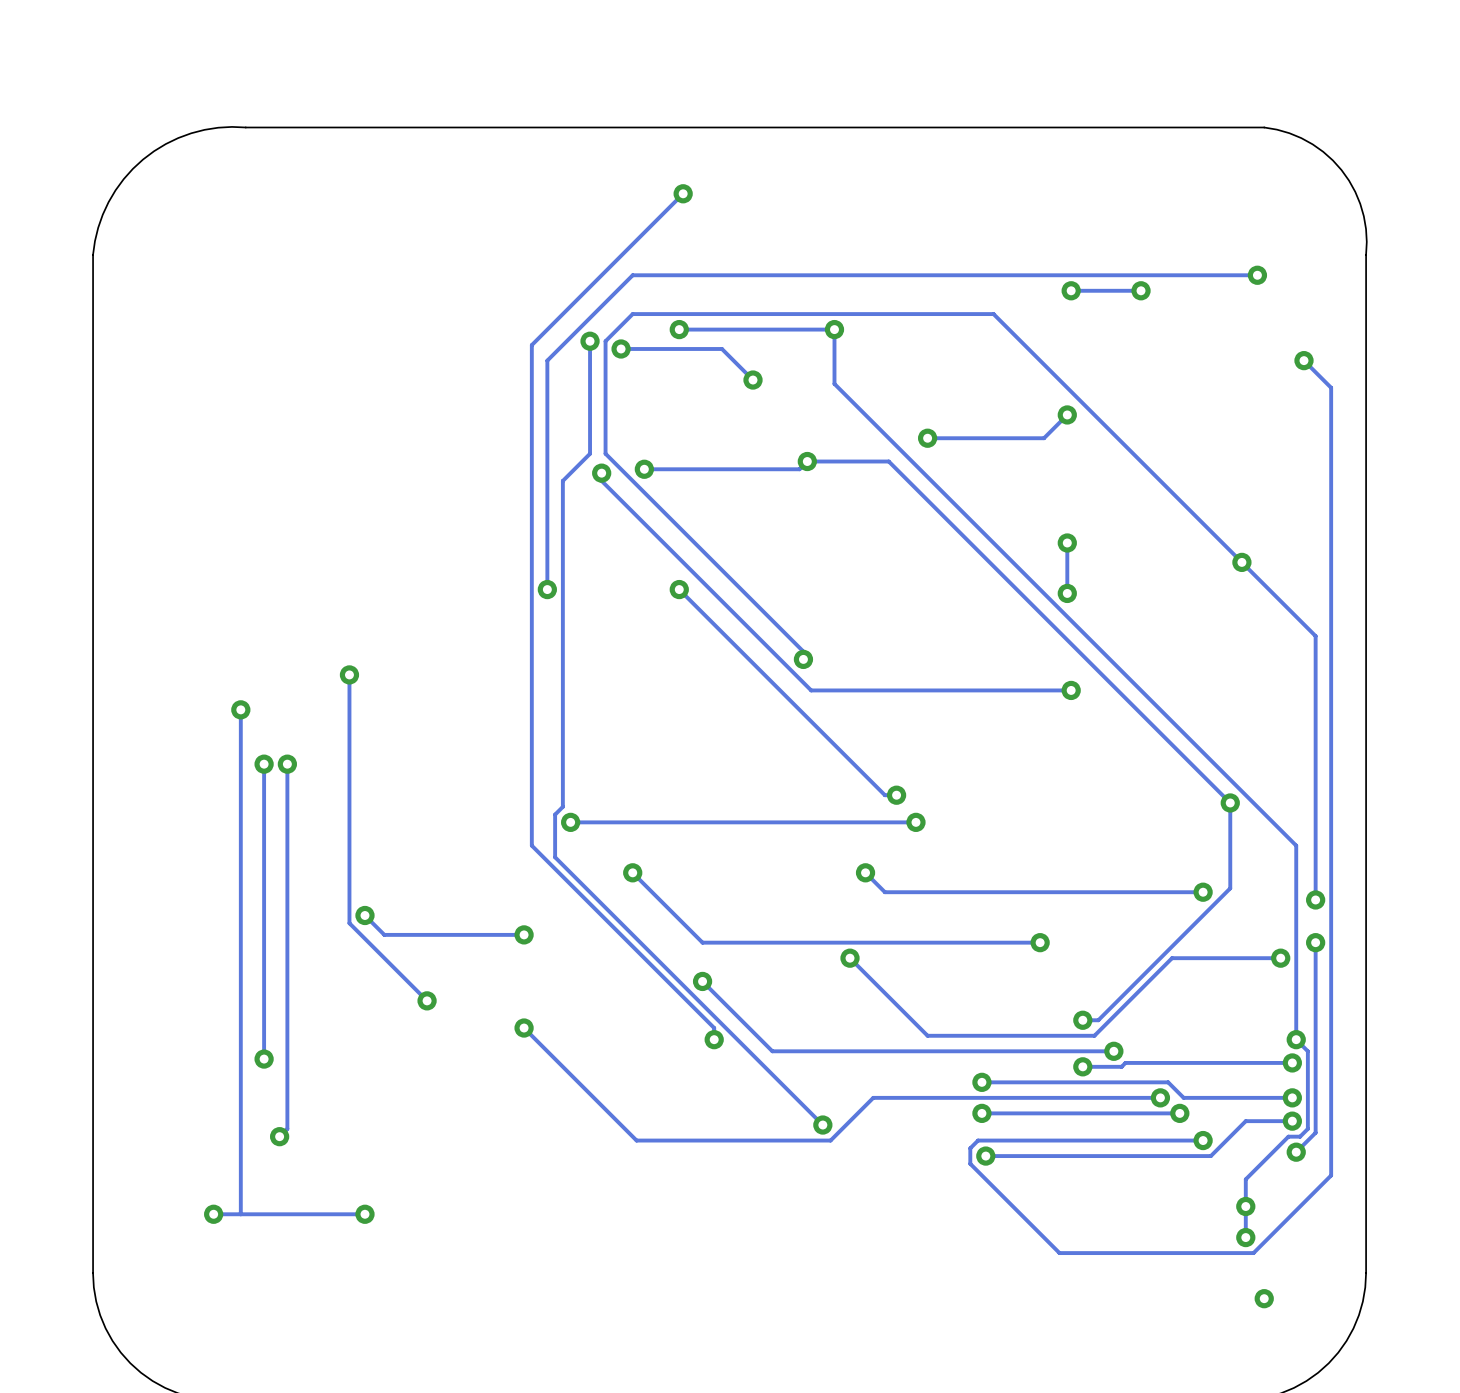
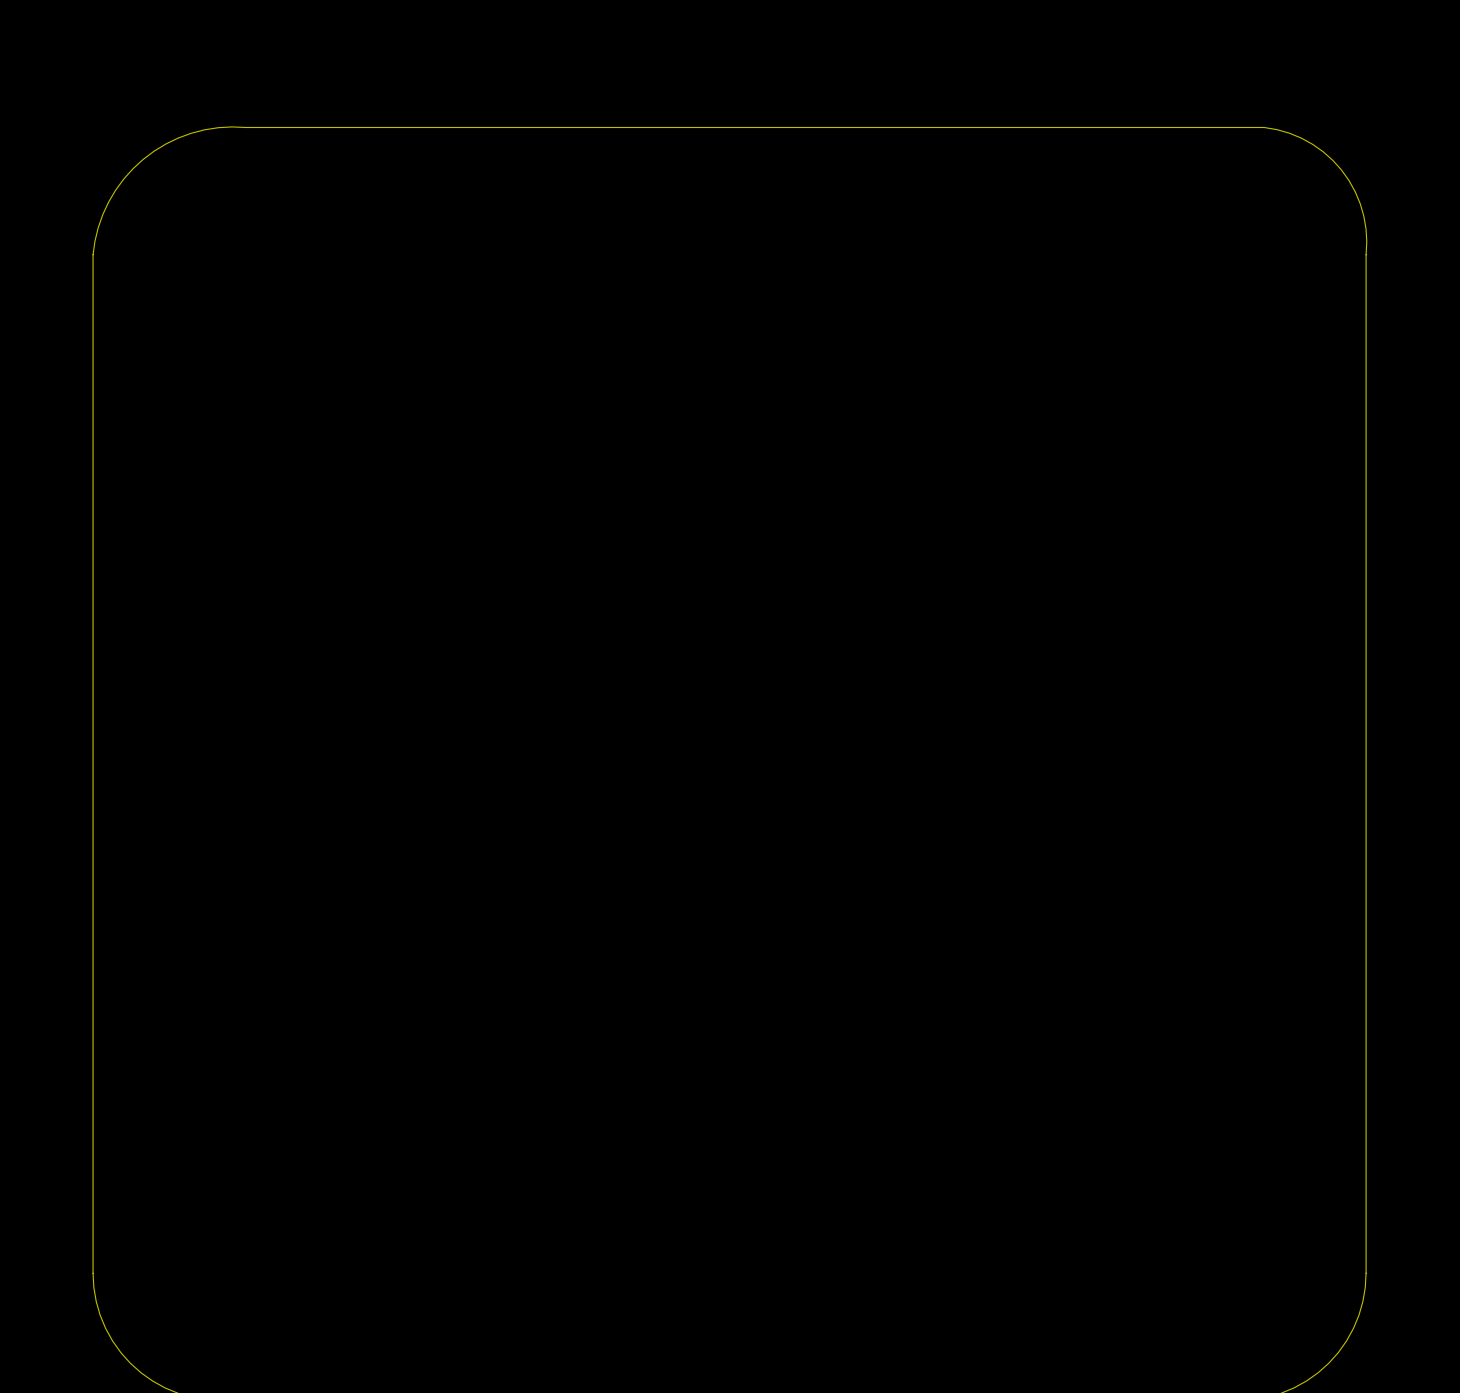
track: (683, 193) (531, 345) (531, 845) (714, 1028) (714, 1039) -> none
via: (683, 193) -> none
track: (1257, 275) (632, 275) (547, 360) (547, 589) -> none
via: (1257, 275) -> none
via: (1071, 290) -> none
track: (1141, 290) (1071, 290) -> none
via: (1141, 290) -> none
track: (679, 329) (834, 329) (834, 383) (1296, 845) (1296, 1039) (1307, 1051) (1307, 1128) (1300, 1136) (1288, 1136) (1245, 1179) (1245, 1237) -> none
via: (679, 329) -> none
via: (834, 329) -> none
track: (590, 341) (590, 453) (562, 480) (562, 806) (555, 814) (555, 857) (822, 1125) -> none
via: (590, 341) -> none
track: (621, 348) (721, 348) (753, 380) -> none
via: (621, 348) -> none
track: (1303, 360) (1331, 387) (1331, 1175) (1253, 1253) (1059, 1253) (970, 1163) (970, 1148) (978, 1140) (1203, 1140) -> none
via: (1303, 360) -> none
via: (753, 380) -> none
track: (1067, 414) (1044, 438) (927, 438) -> none
via: (1067, 414) -> none
via: (927, 438) -> none
via: (807, 461) -> none
track: (644, 469) (799, 469) (807, 461) (888, 461) (1230, 802) (1230, 888) (1098, 1020) (1082, 1020) -> none
via: (644, 469) -> none
track: (601, 473) (601, 480) (811, 690) (1071, 690) -> none
via: (601, 473) -> none
track: (1067, 543) (1067, 593) -> none
via: (1067, 543) -> none
via: (1241, 562) -> none
via: (547, 589) -> none
track: (679, 589) (884, 795) (896, 795) -> none
via: (679, 589) -> none
via: (1067, 593) -> none
track: (803, 659) (803, 651) (605, 453) (605, 341) (632, 314) (993, 314) (1315, 636) (1315, 899) -> none
via: (803, 659) -> none
track: (349, 674) (349, 923) (427, 1000) -> none
via: (349, 674) -> none
via: (1071, 690) -> none
track: (240, 709) (240, 1214) -> none
via: (240, 709) -> none
track: (264, 764) (264, 1059) -> none
via: (264, 764) -> none
track: (287, 764) (287, 1128) (279, 1136) -> none
via: (287, 764) -> none
via: (896, 795) -> none
via: (1230, 802) -> none
via: (570, 822) -> none
track: (915, 822) (570, 822) -> none
via: (915, 822) -> none
track: (632, 872) (702, 942) (1040, 942) -> none
via: (632, 872) -> none
track: (865, 872) (884, 892) (1203, 892) -> none
via: (865, 872) -> none
via: (1203, 892) -> none
via: (1315, 899) -> none
track: (364, 915) (384, 934) (524, 934) -> none
via: (364, 915) -> none
via: (524, 934) -> none
via: (1040, 942) -> none
track: (1315, 942) (1315, 1132) (1296, 1152) -> none
via: (1315, 942) -> none
via: (850, 958) -> none
track: (1280, 958) (1172, 958) (1094, 1035) (927, 1035) (850, 958) -> none
via: (1280, 958) -> none
track: (702, 981) (772, 1051) (1113, 1051) -> none
via: (702, 981) -> none
via: (427, 1000) -> none
via: (1082, 1020) -> none
track: (524, 1028) (636, 1140) (830, 1140) (873, 1097) (1160, 1097) -> none
via: (524, 1028) -> none
via: (714, 1039) -> none
via: (1296, 1039) -> none
via: (1113, 1051) -> none
via: (264, 1059) -> none
track: (1292, 1062) (1125, 1062) (1121, 1066) (1082, 1066) -> none
via: (1292, 1062) -> none
via: (1082, 1066) -> none
track: (981, 1082) (1168, 1082) (1183, 1097) (1292, 1097) -> none
via: (981, 1082) -> none
via: (1160, 1097) -> none
via: (1292, 1097) -> none
via: (981, 1113) -> none
track: (1179, 1113) (981, 1113) -> none
via: (1179, 1113) -> none
track: (1292, 1121) (1245, 1121) (1210, 1156) (985, 1156) -> none
via: (1292, 1121) -> none
via: (822, 1125) -> none
via: (279, 1136) -> none
via: (1203, 1140) -> none
via: (1296, 1152) -> none
via: (985, 1156) -> none
via: (1245, 1206) -> none
via: (213, 1214) -> none
track: (364, 1214) (213, 1214) -> none
via: (364, 1214) -> none
via: (1245, 1237) -> none
via: (1264, 1298) -> none

